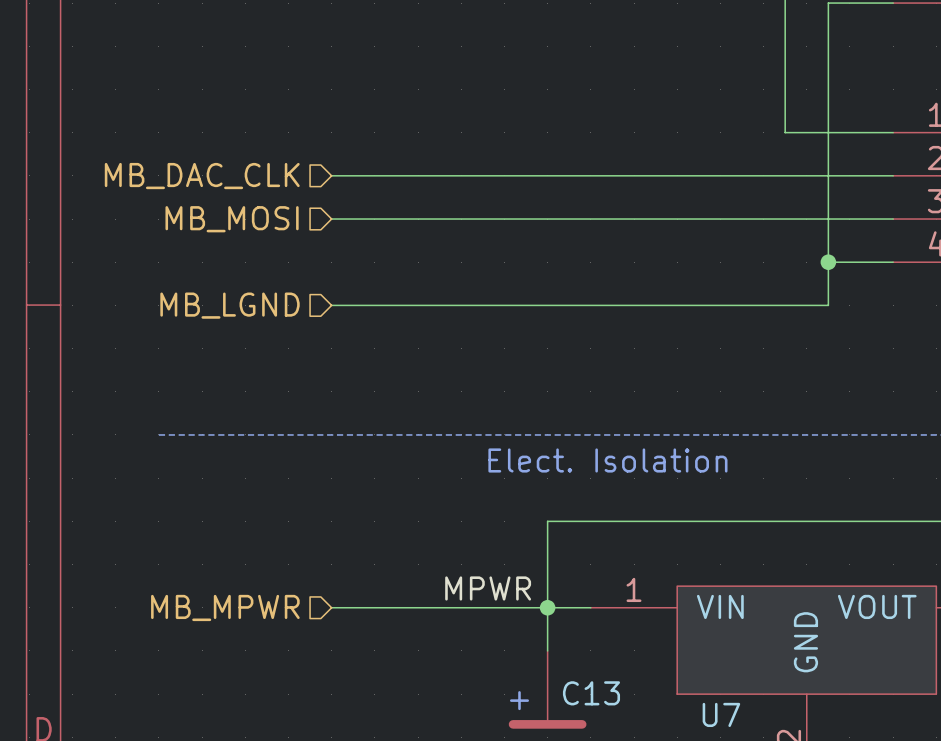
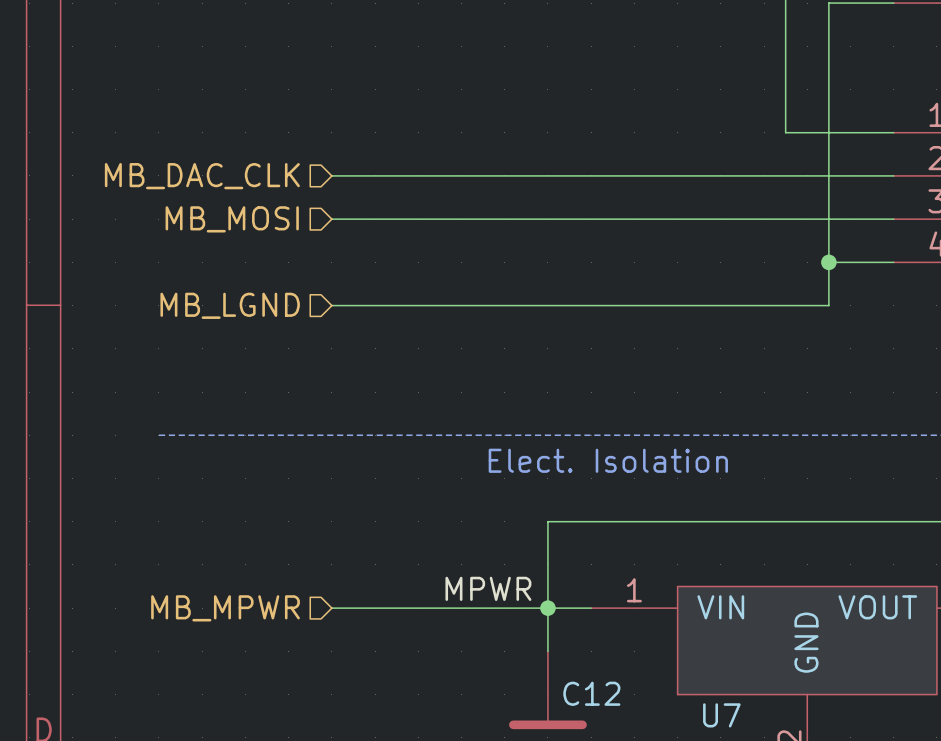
C13 name: C13 (591, 693) -> C12 (591, 693)
text: + (519, 700) -> none

